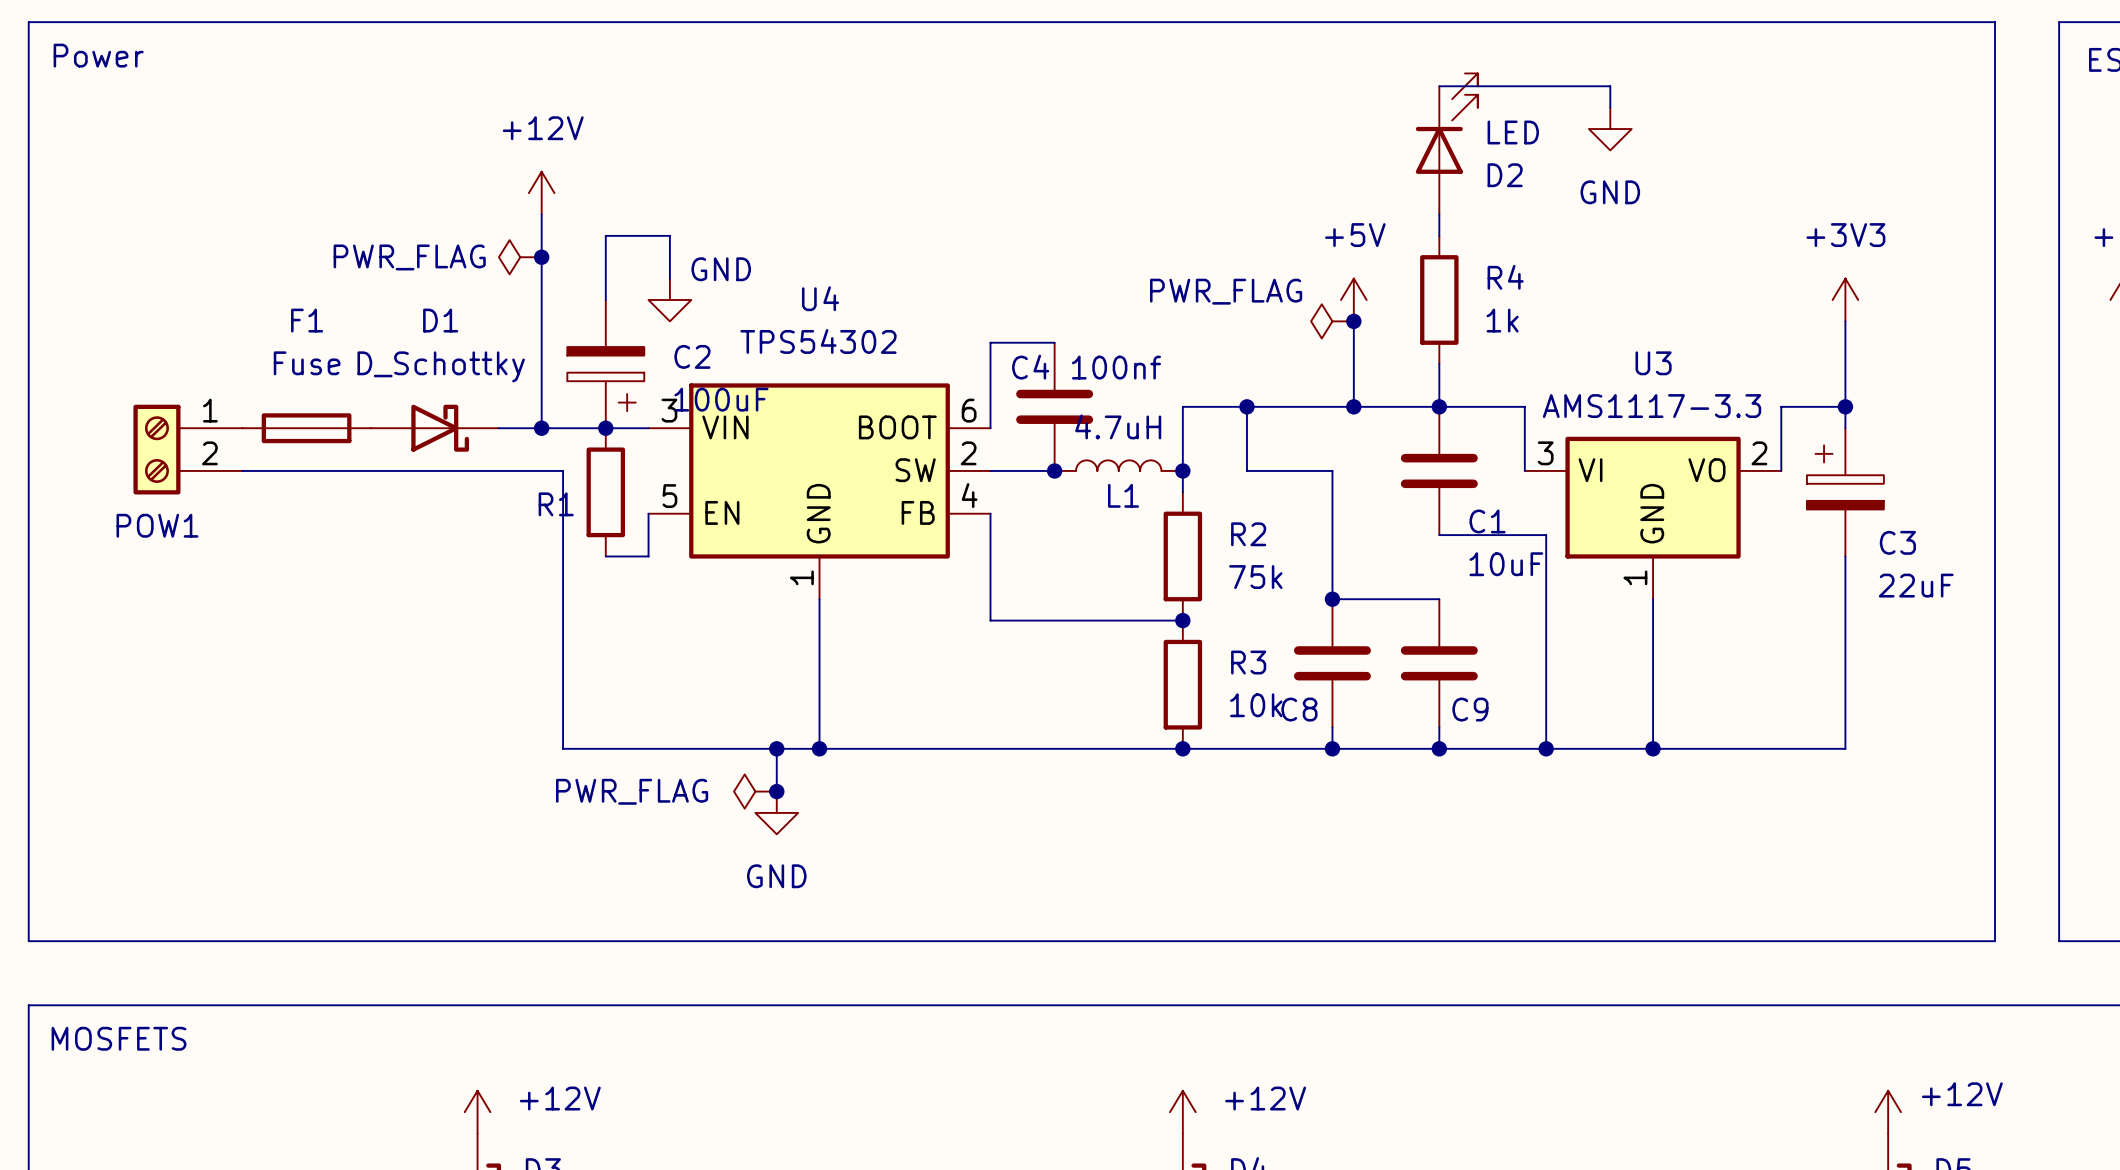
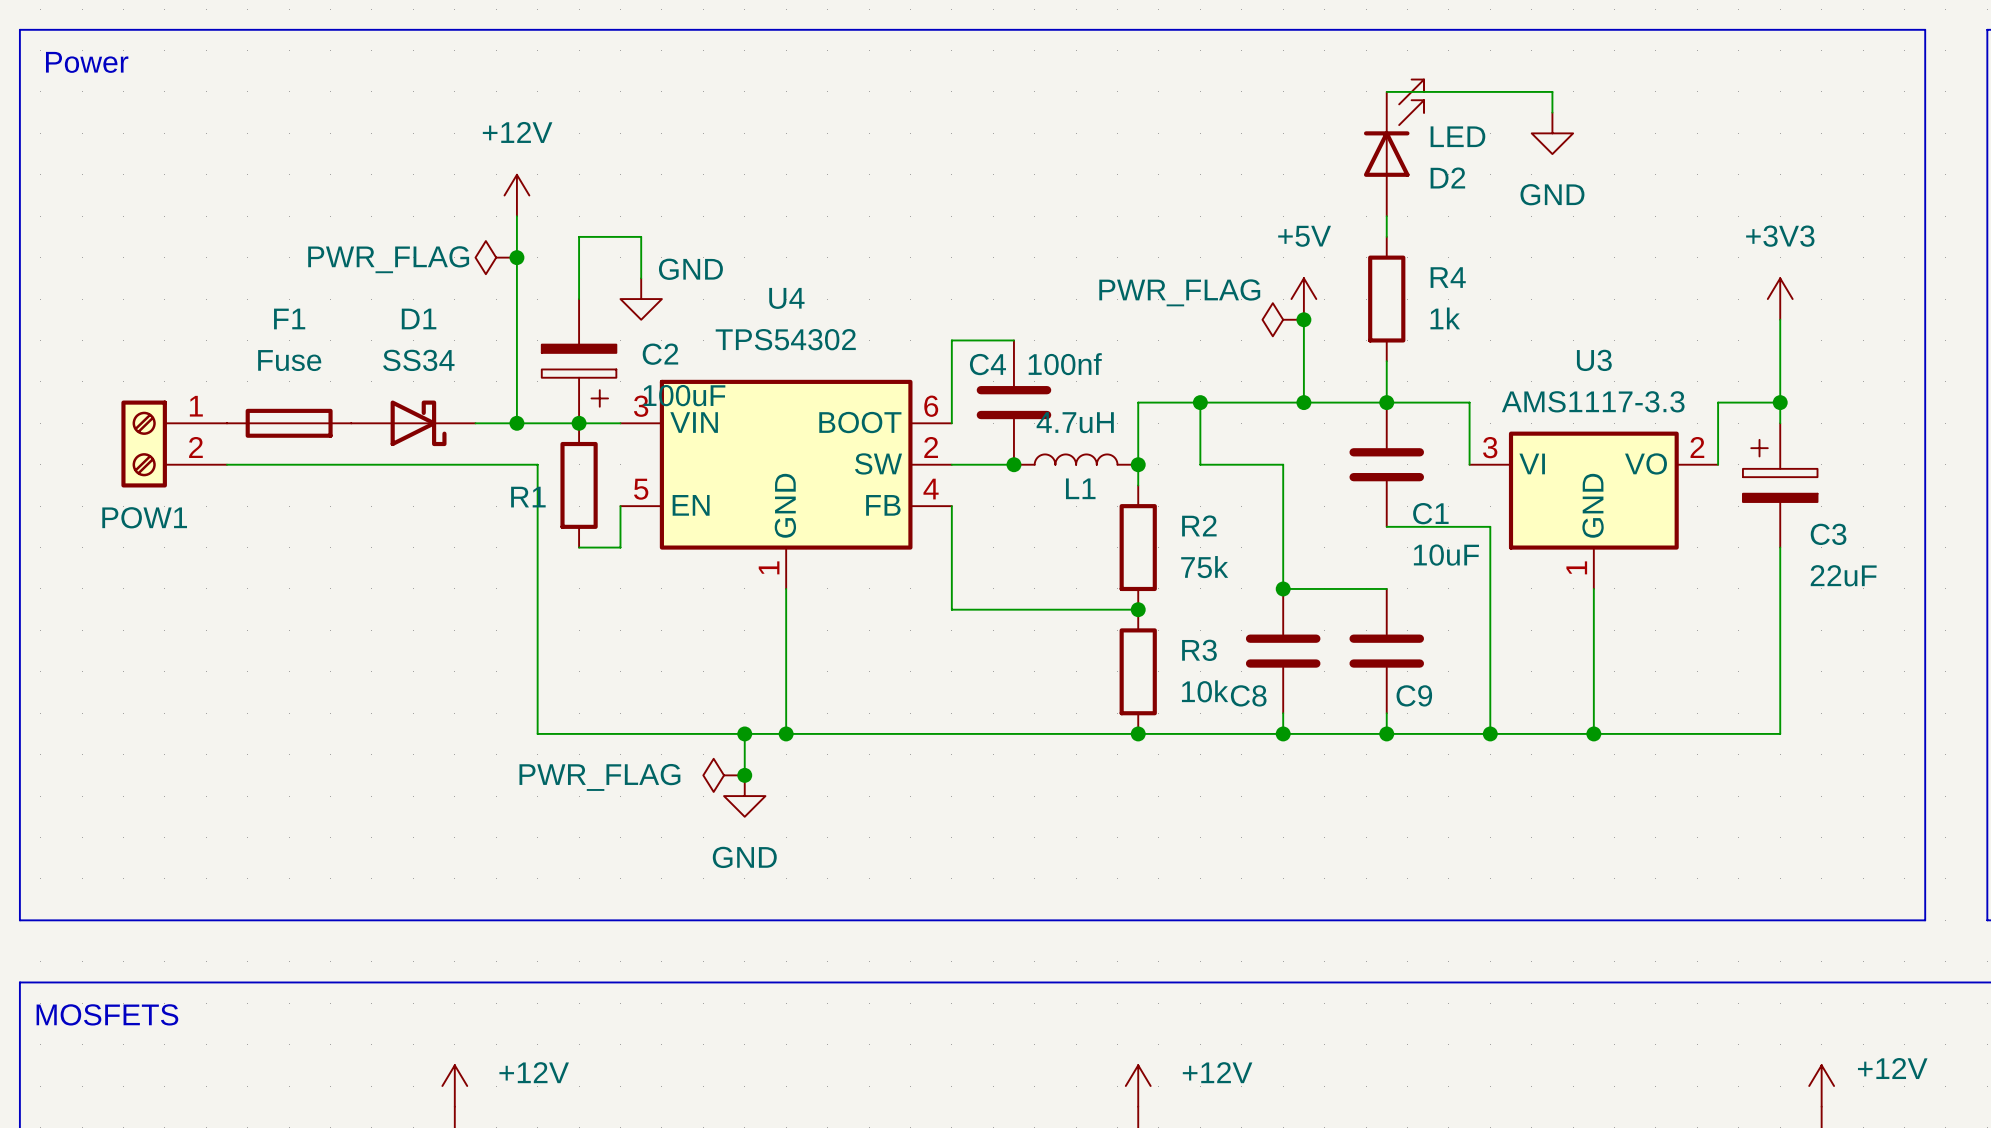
D1 value: D_Schottky (441, 366) -> SS34 (418, 360)

